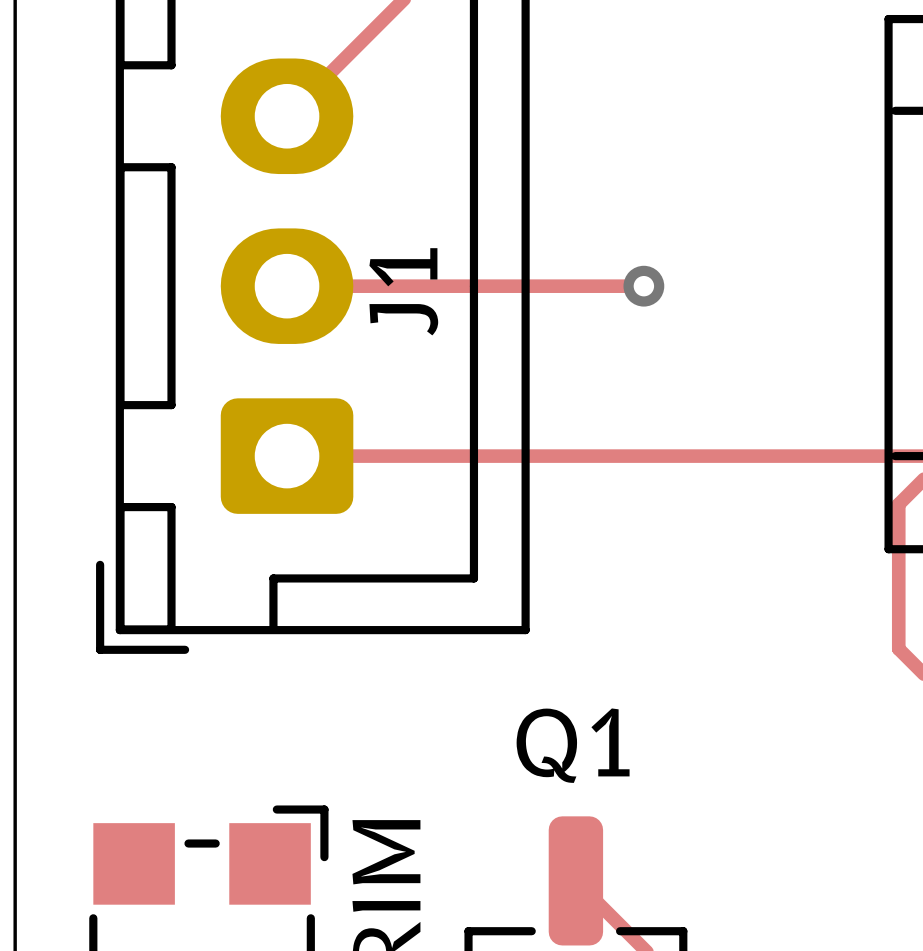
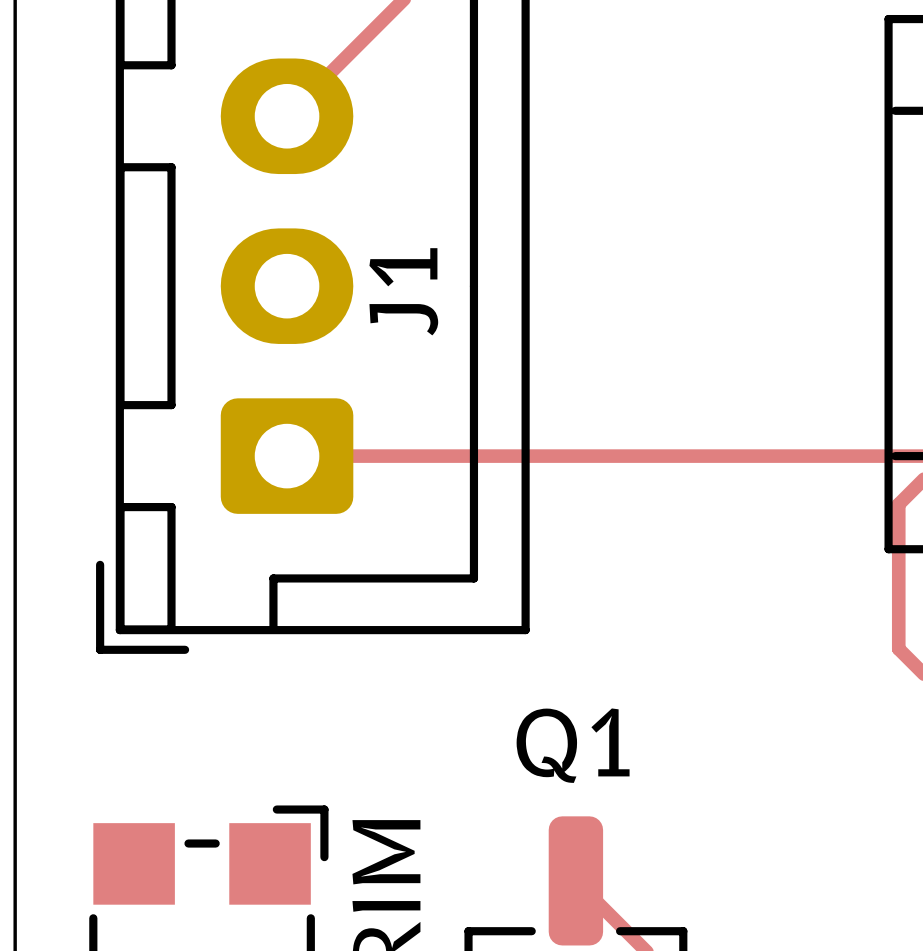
top track: (287, 286) (643, 286) -> none
via: (643, 286) -> none

